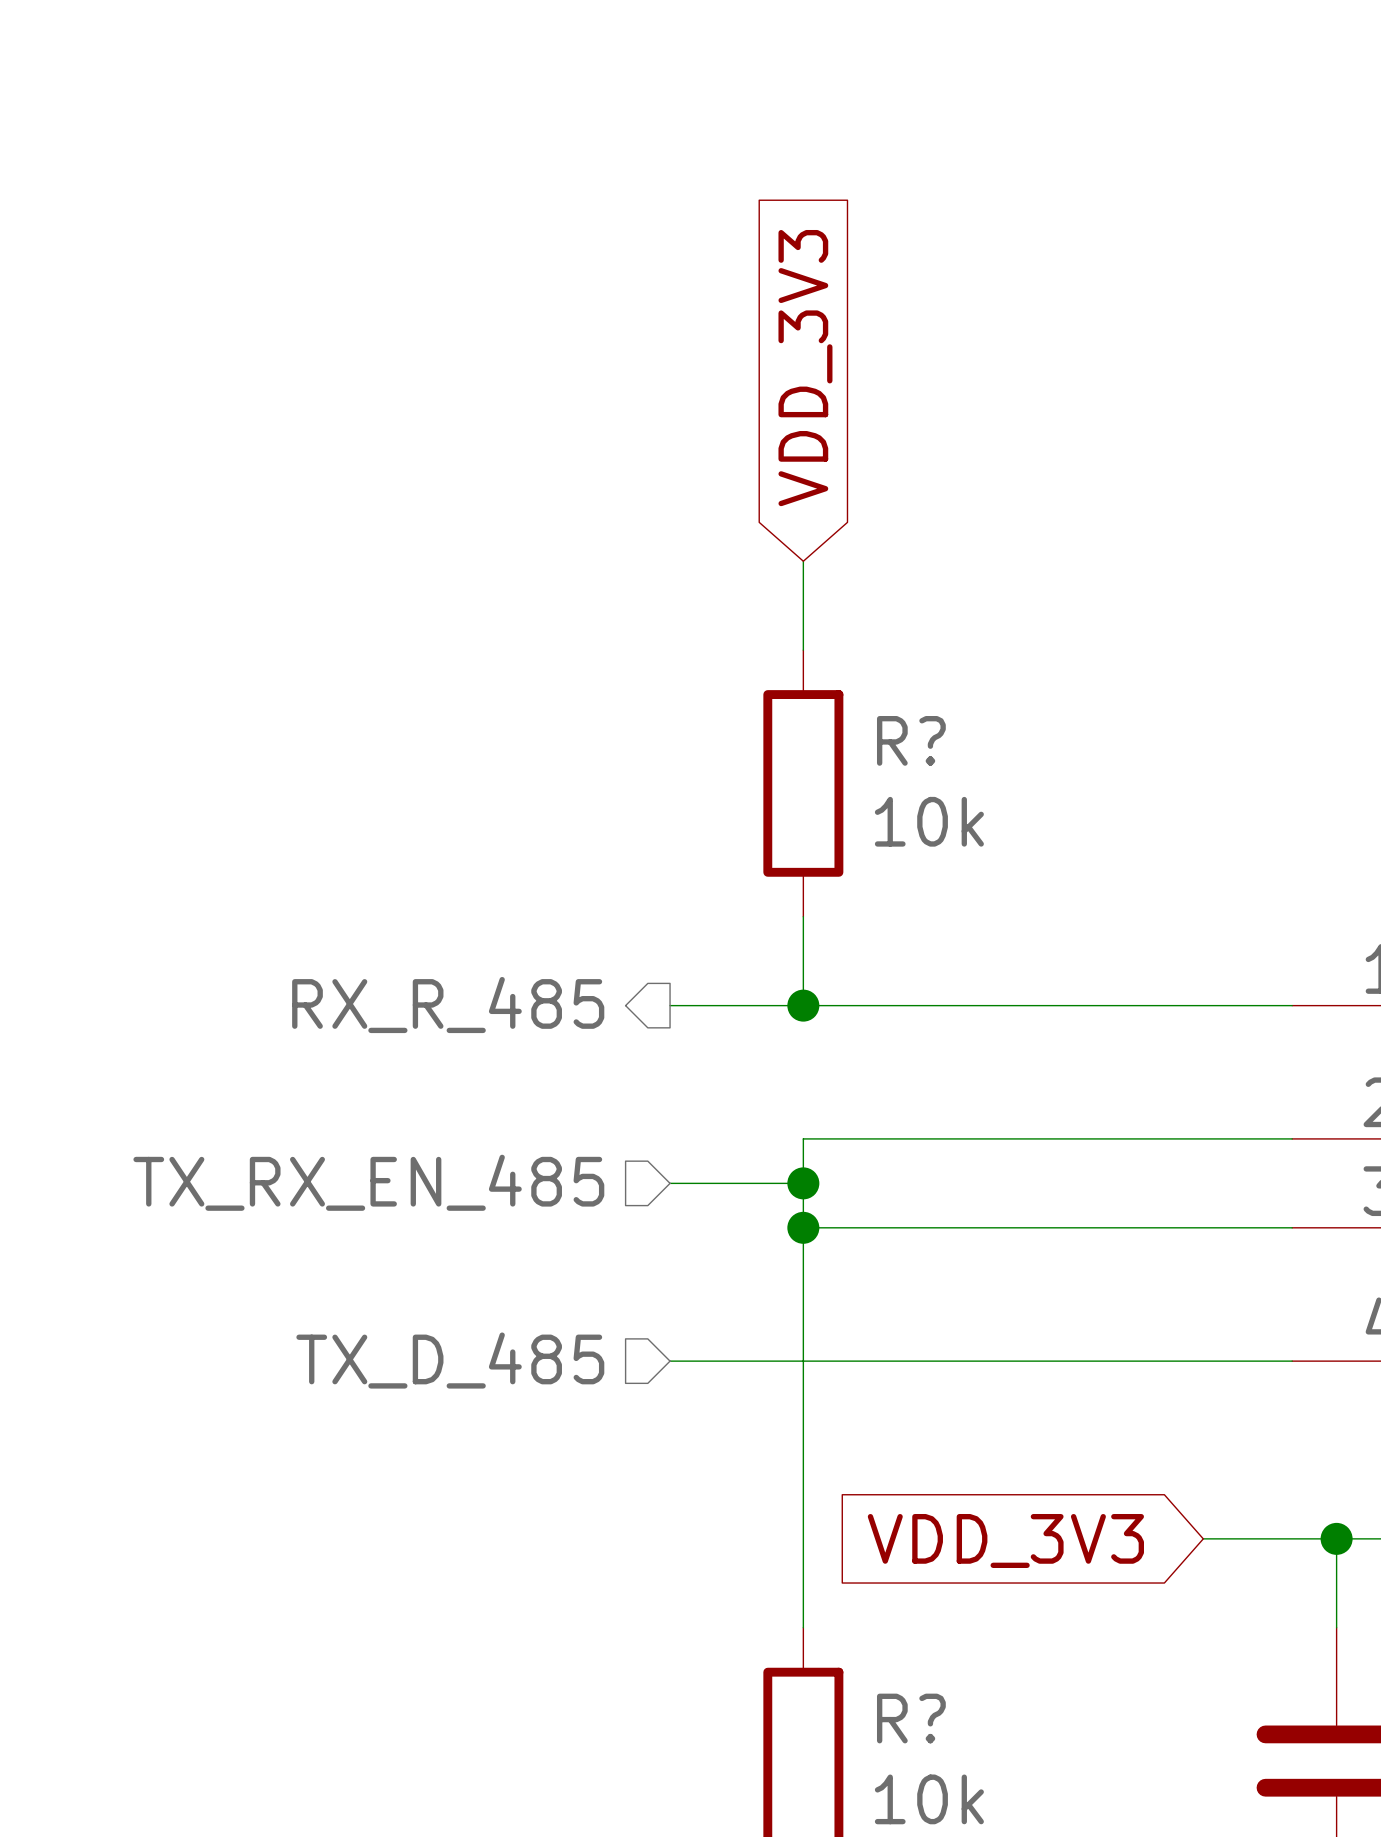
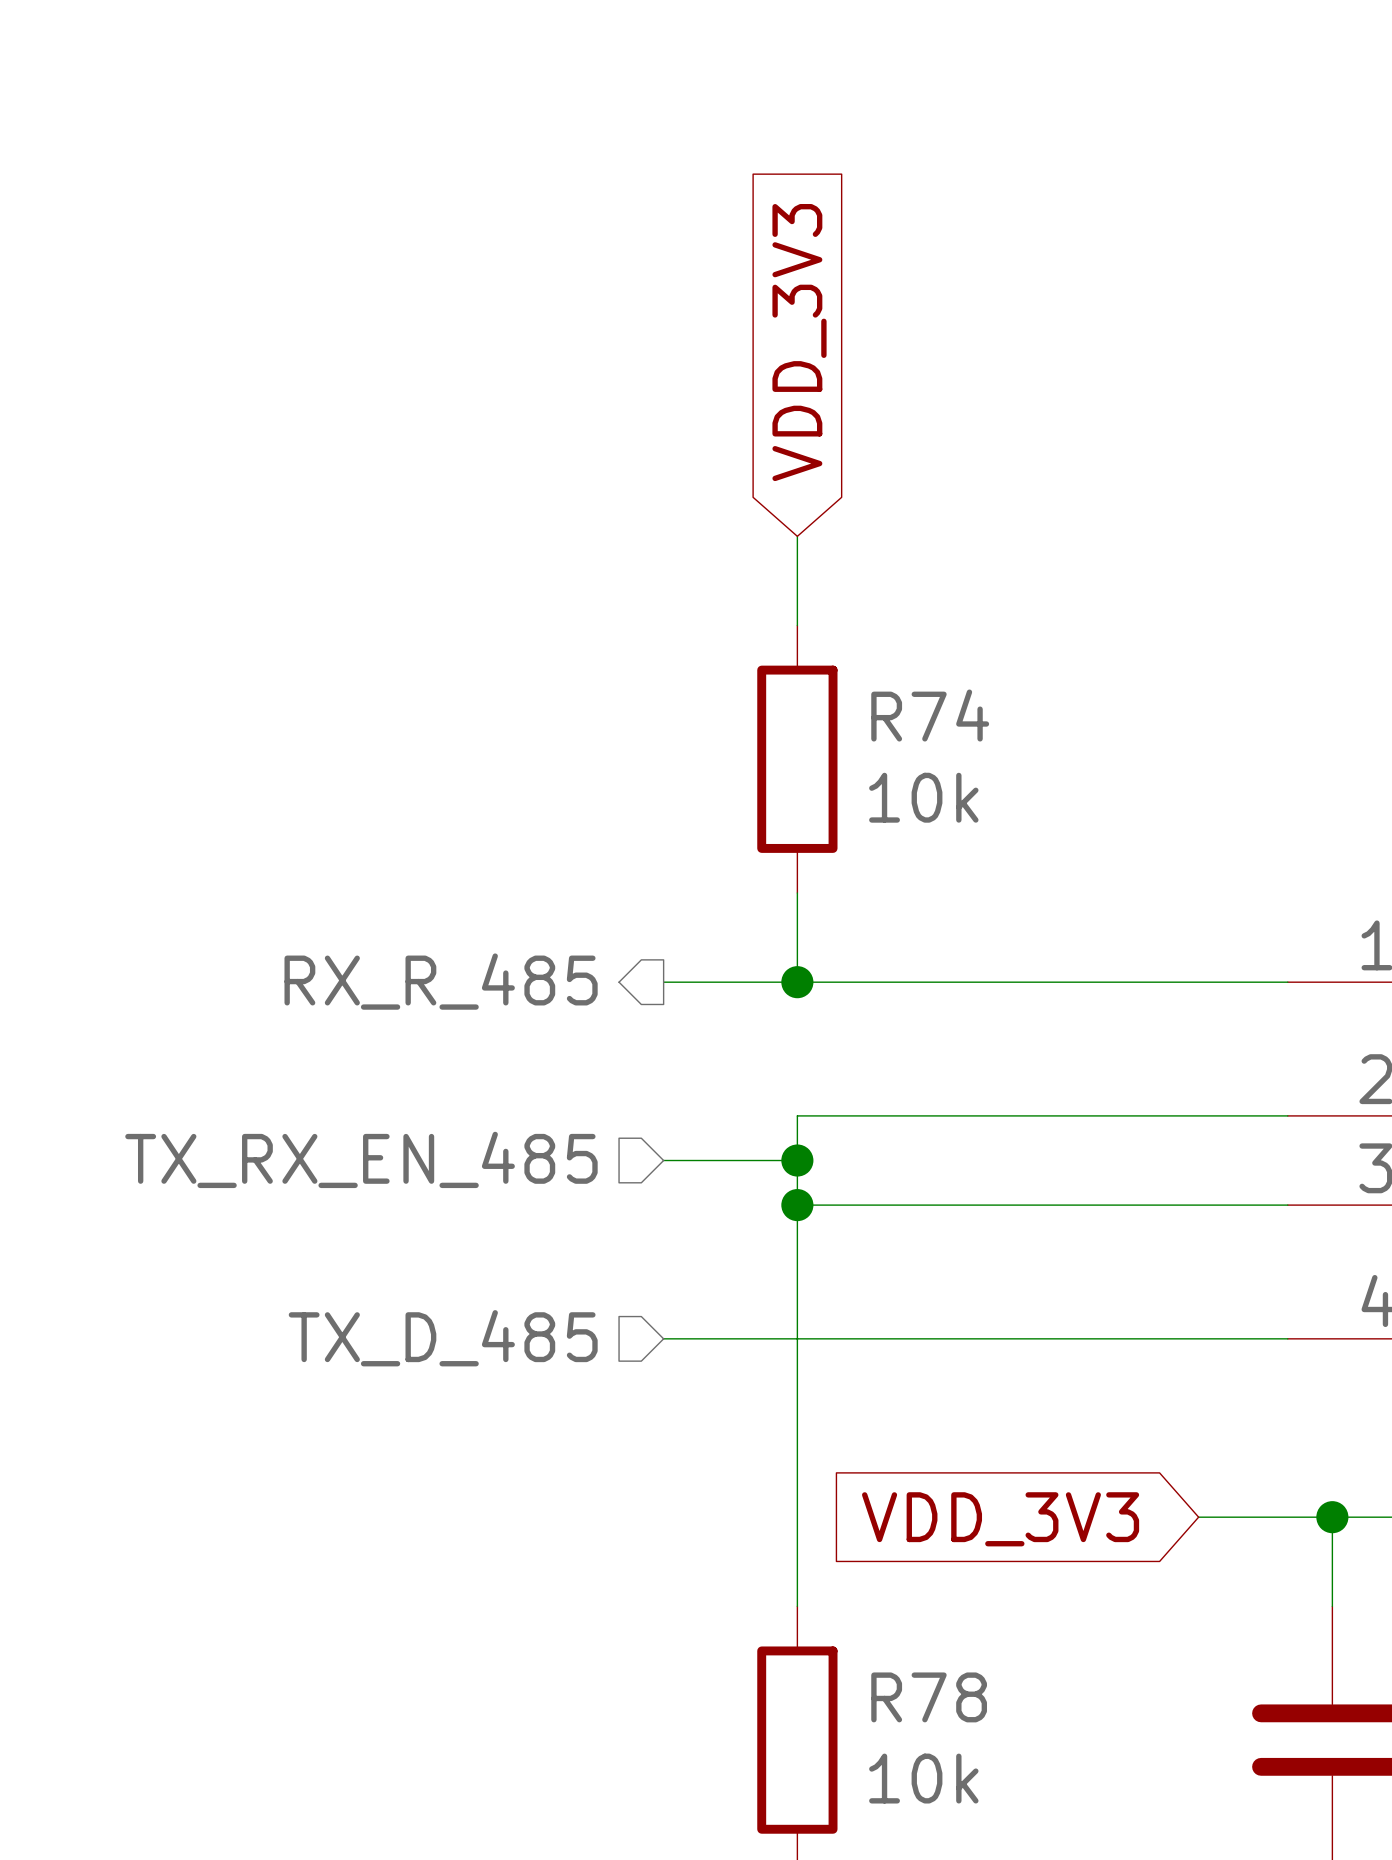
R? name: R? (911, 740) -> R74 (930, 715)
R? name: R? (911, 1718) -> R78 (929, 1697)

